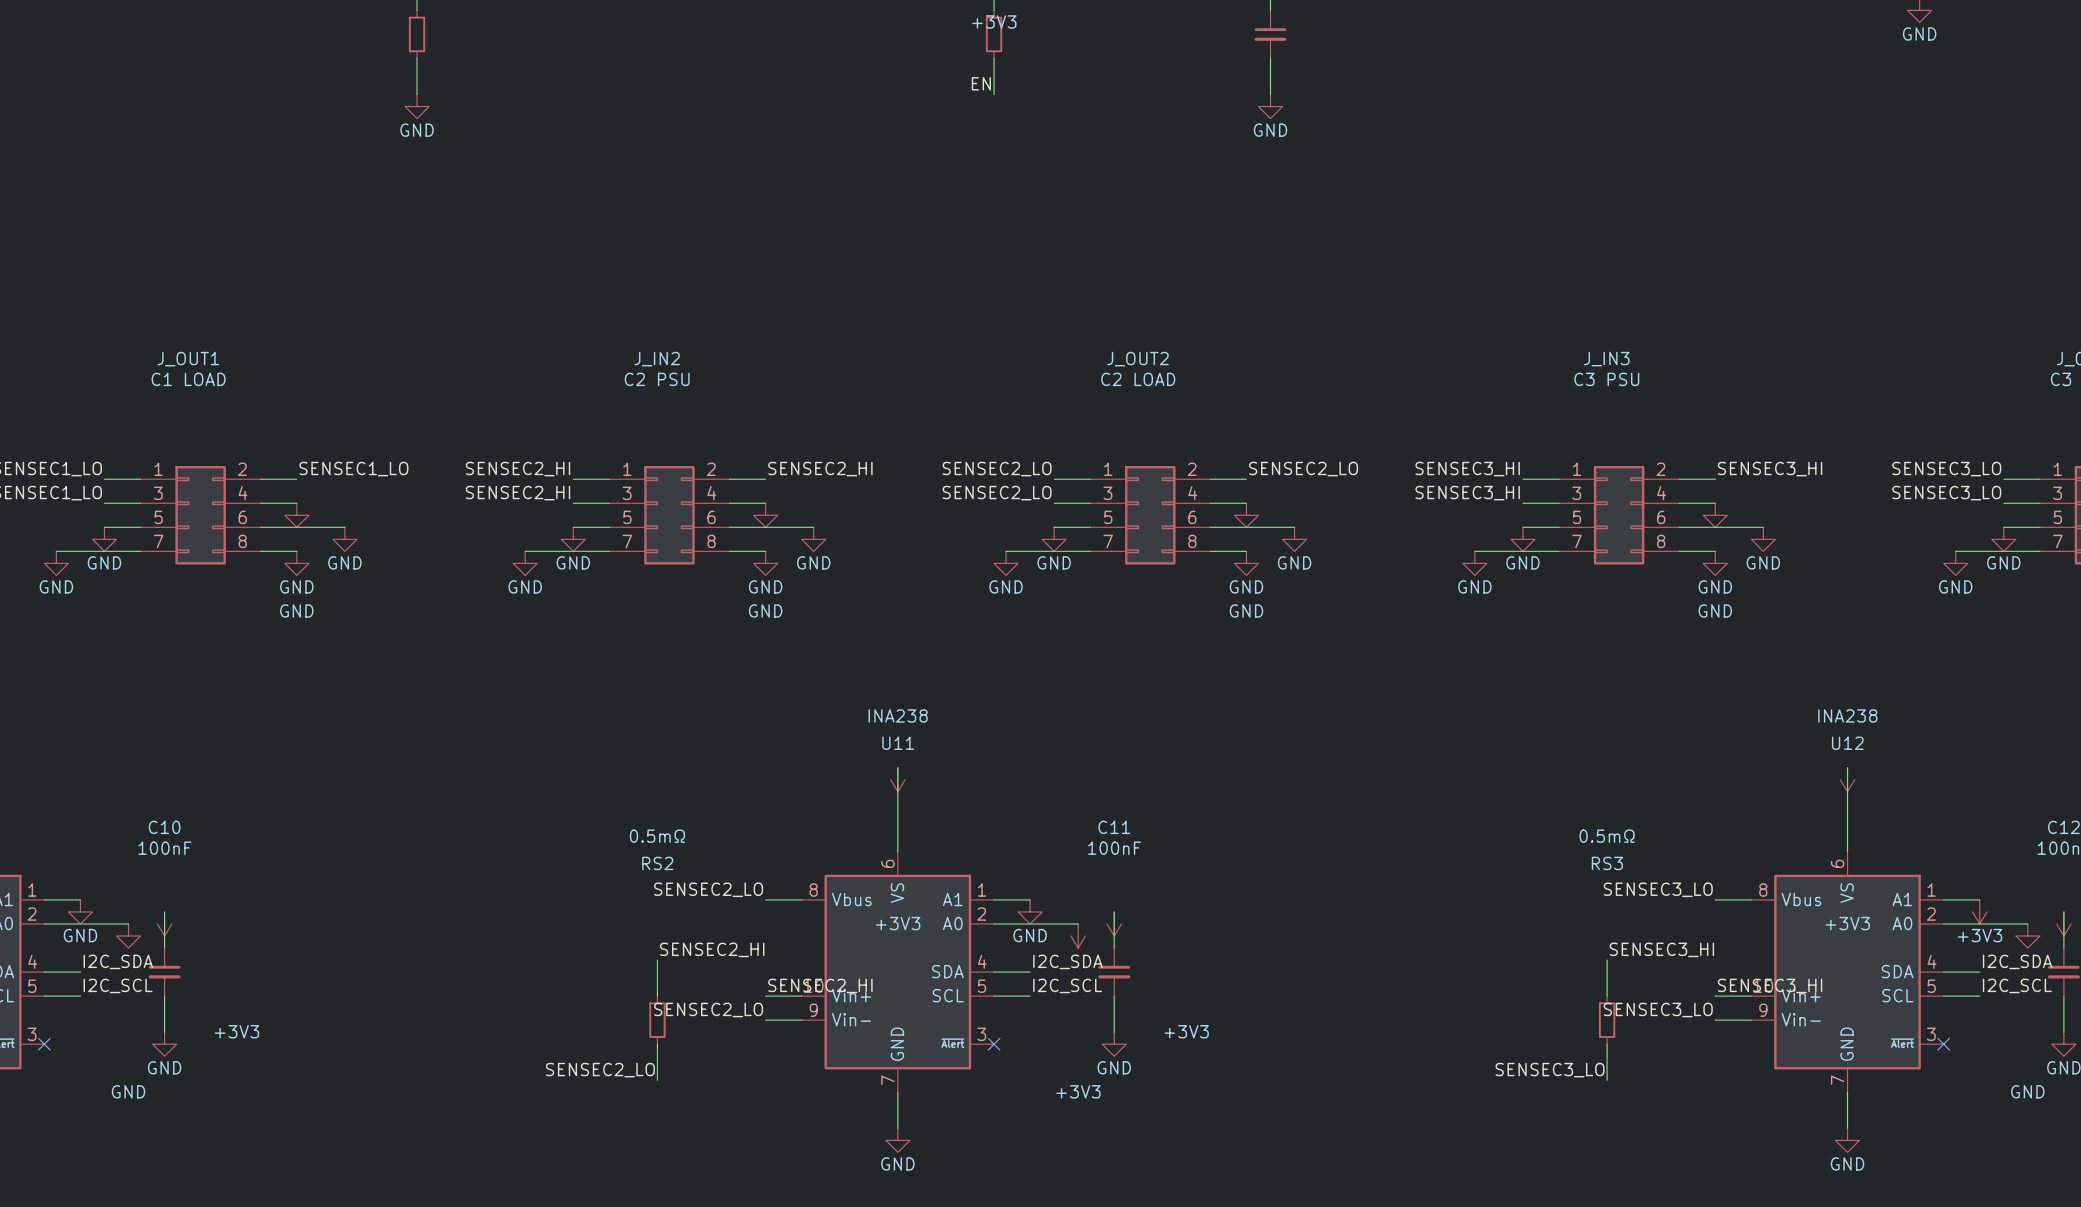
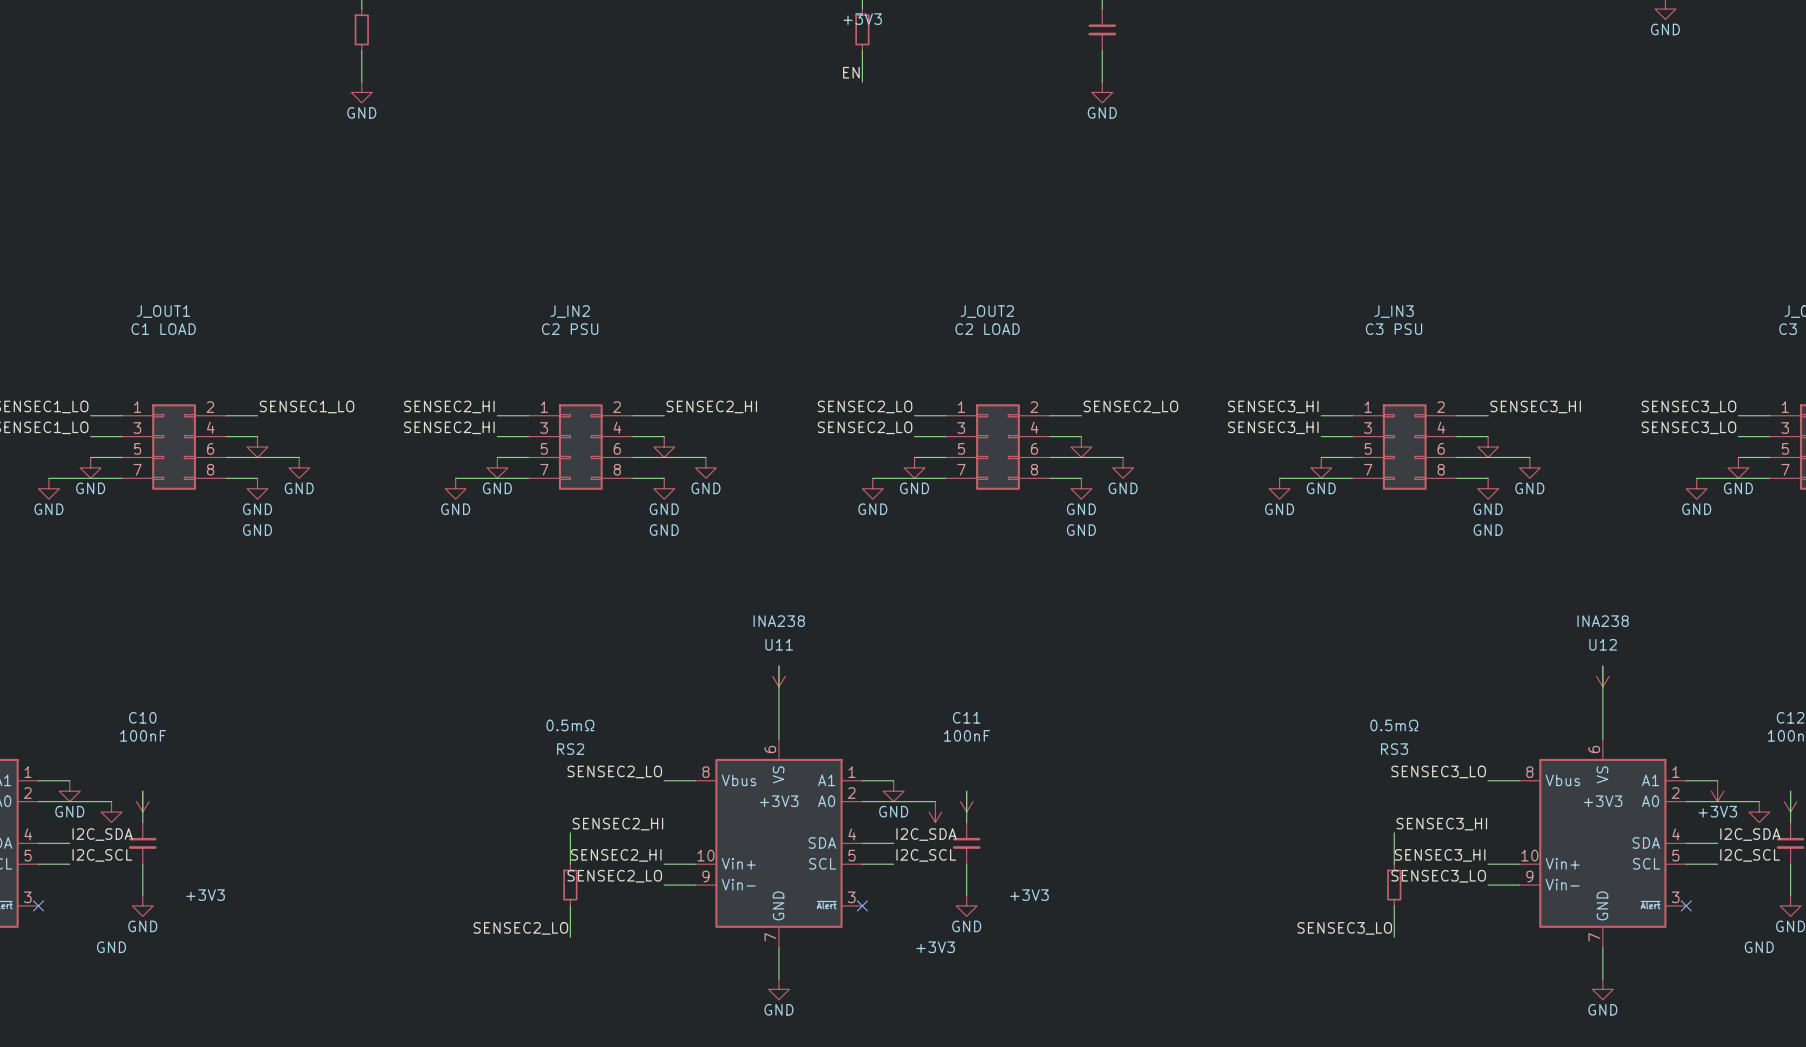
label position: SENSEC2_HI (820, 985) -> SENSEC2_HI (616, 855)
label position: SENSEC3_HI (1770, 985) -> SENSEC3_HI (1440, 855)

